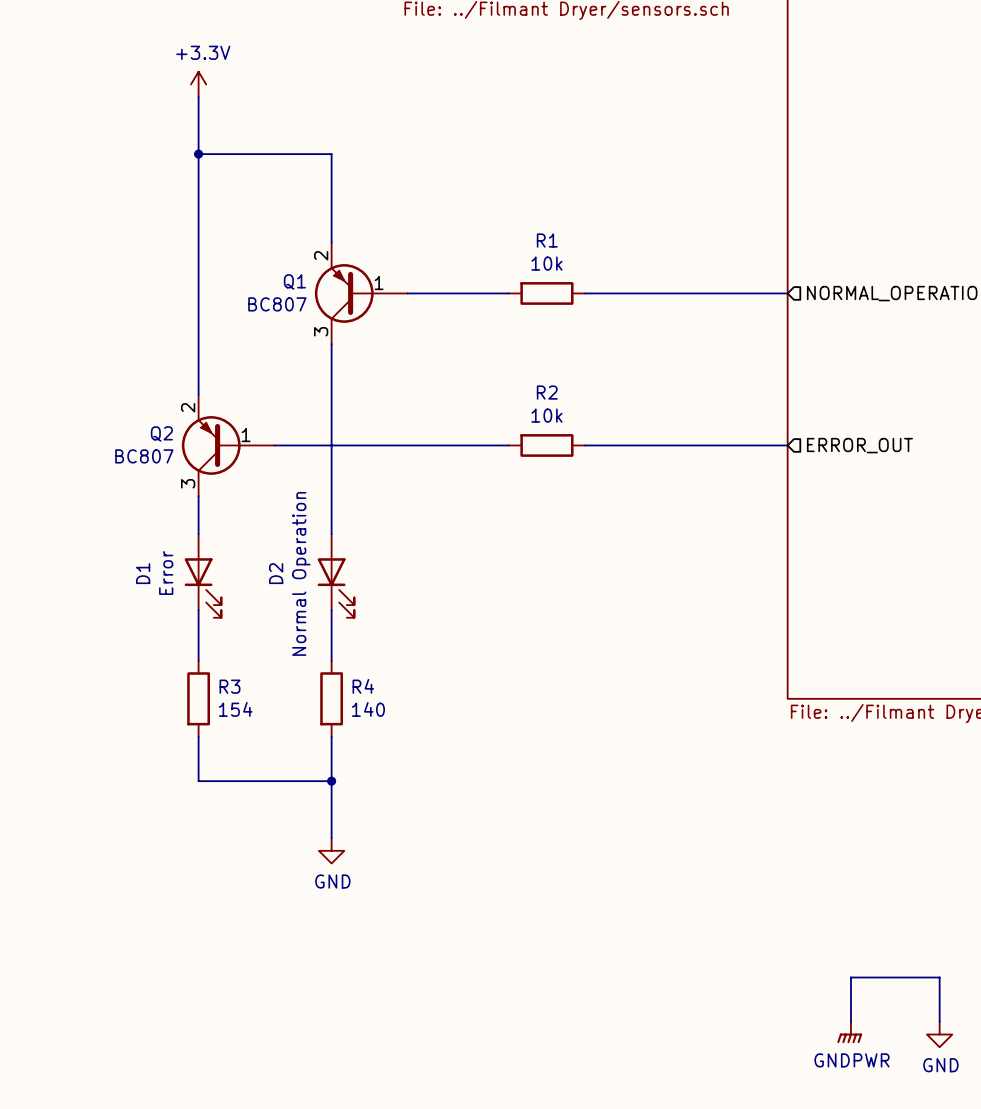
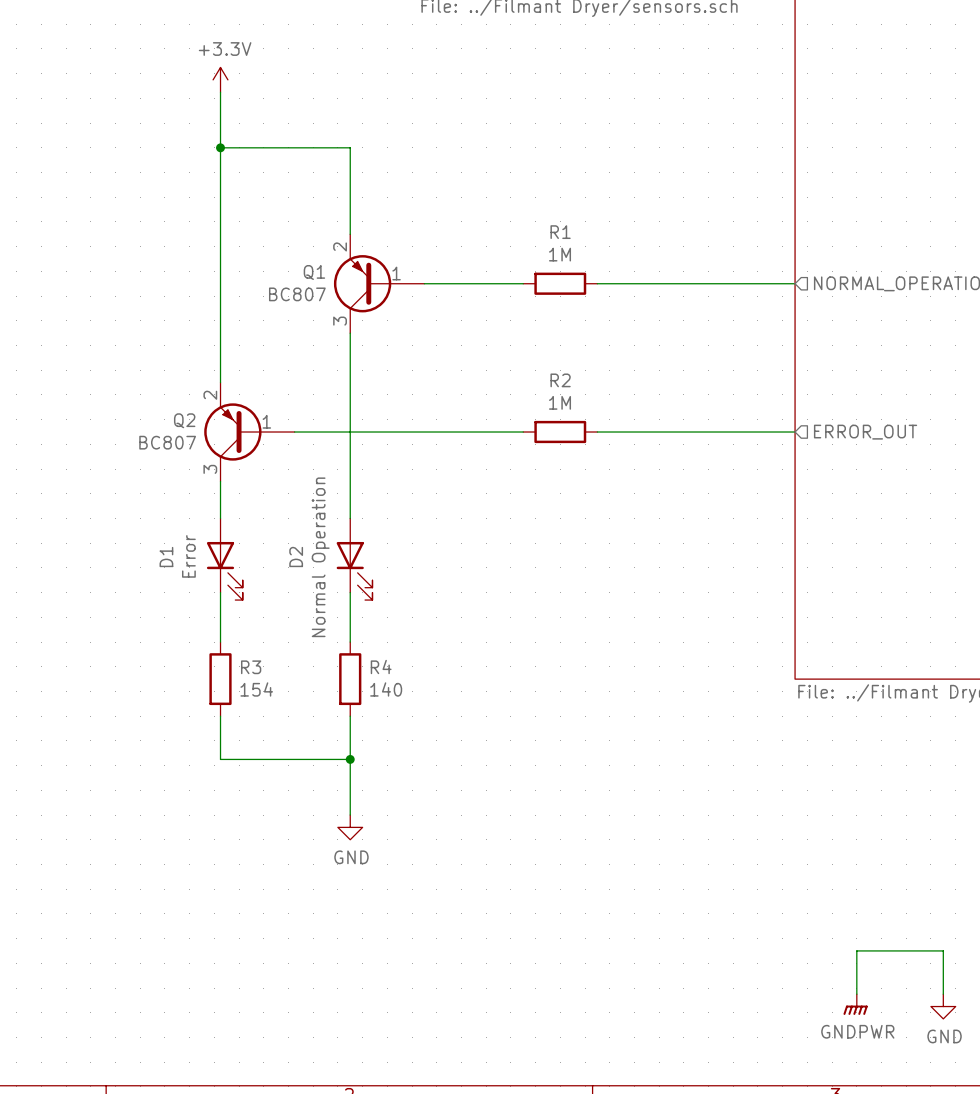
R1 value: 10k (546, 263) -> 1M (559, 254)
R2 value: 10k (546, 415) -> 1M (559, 402)

